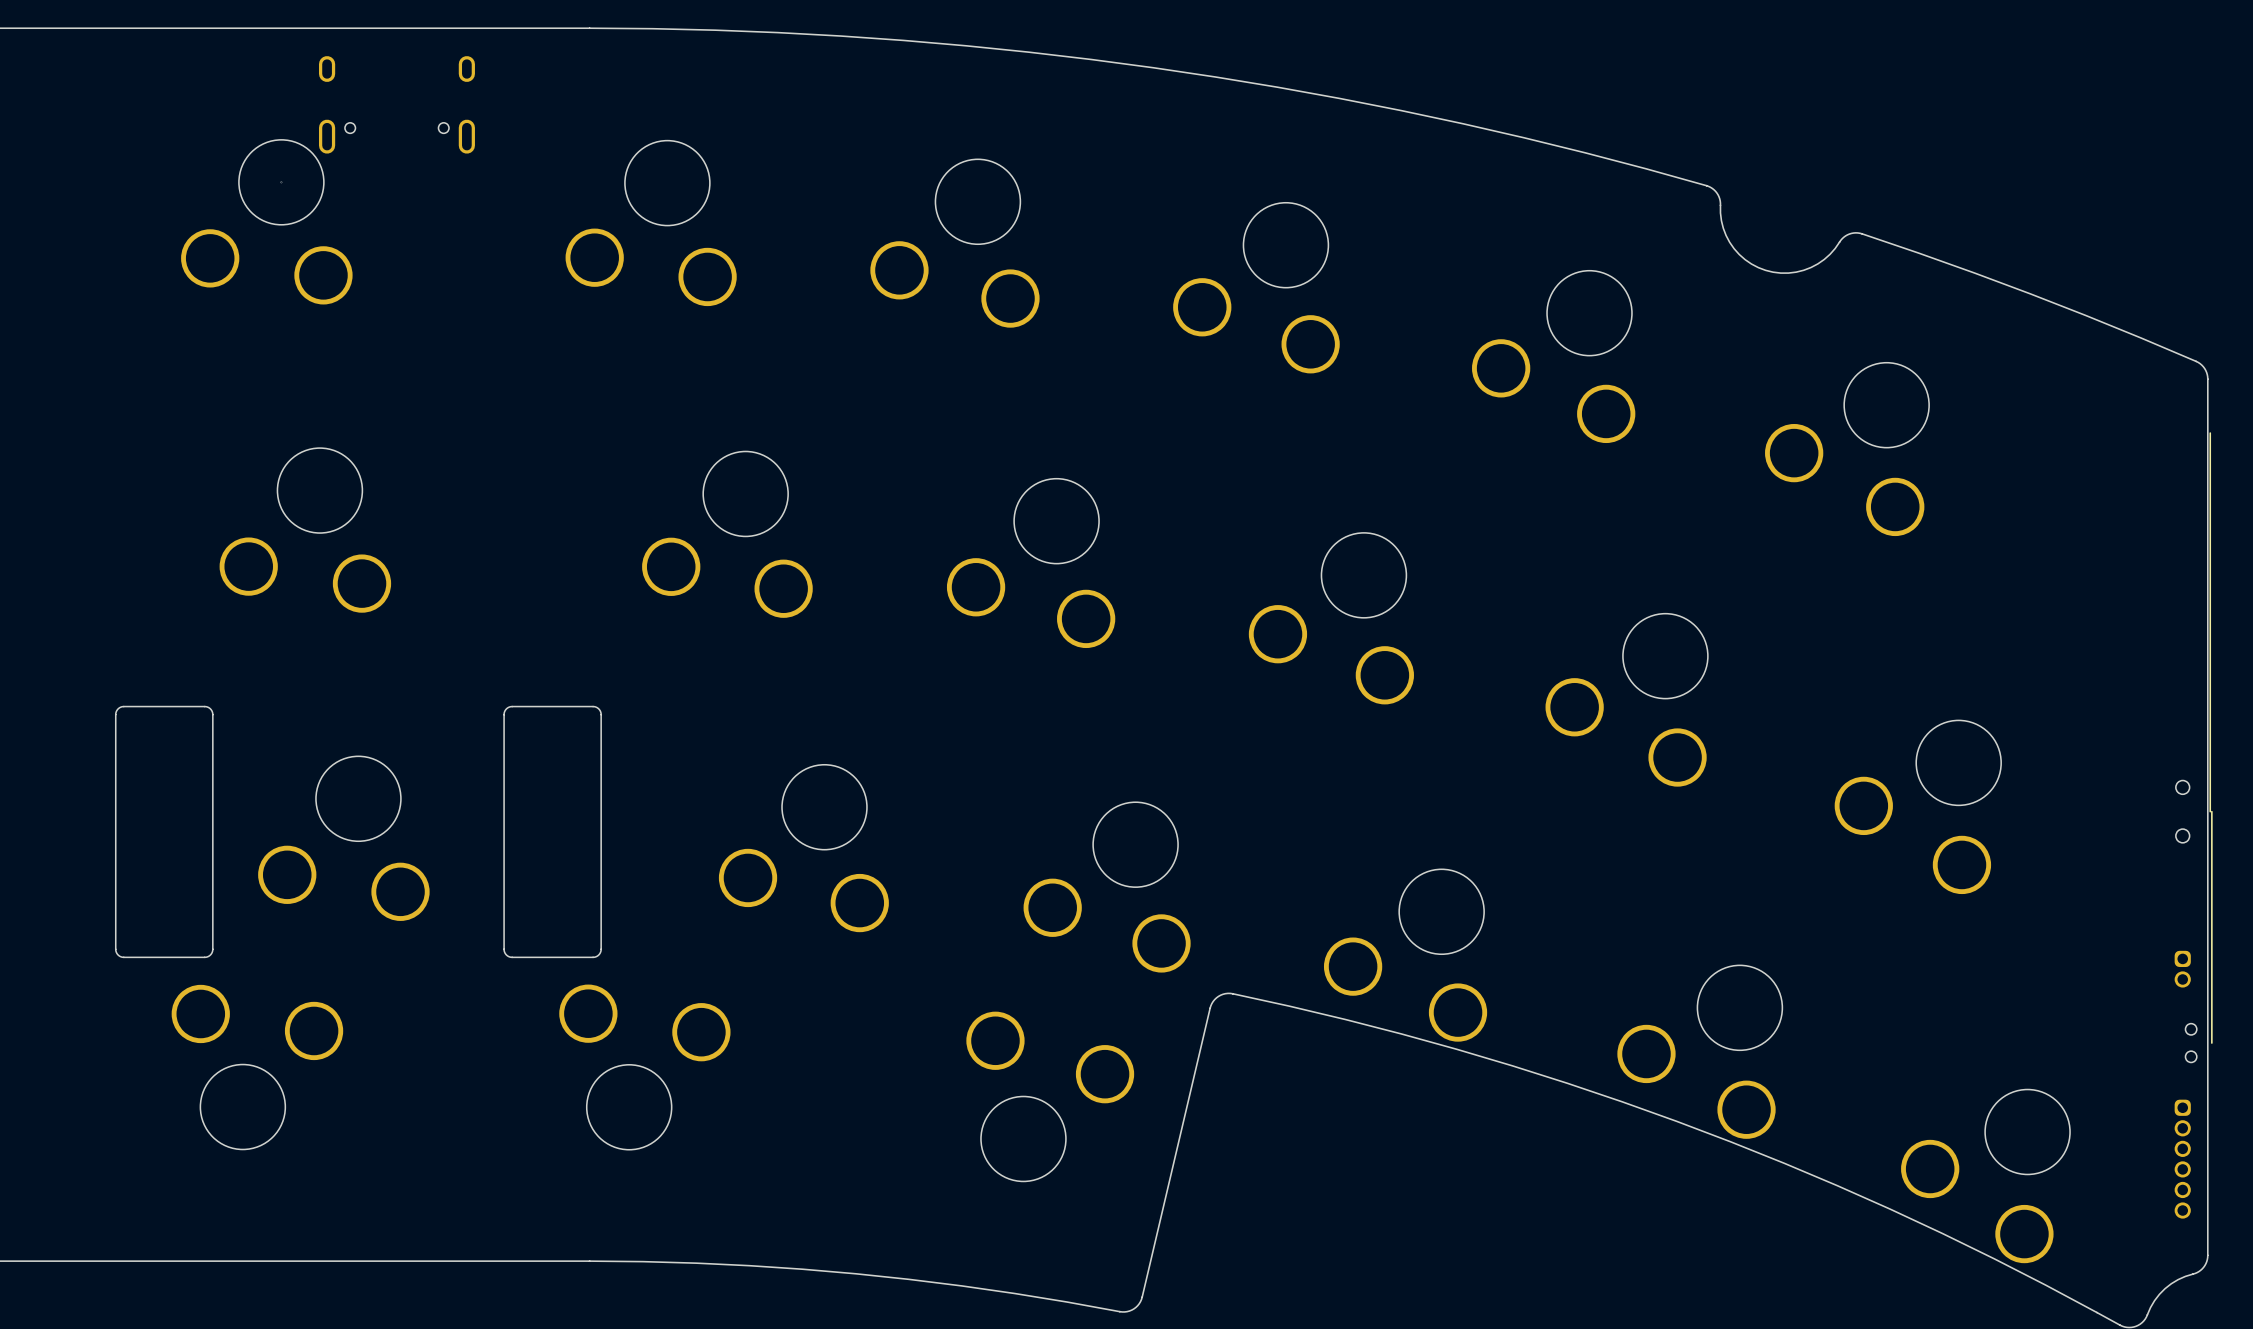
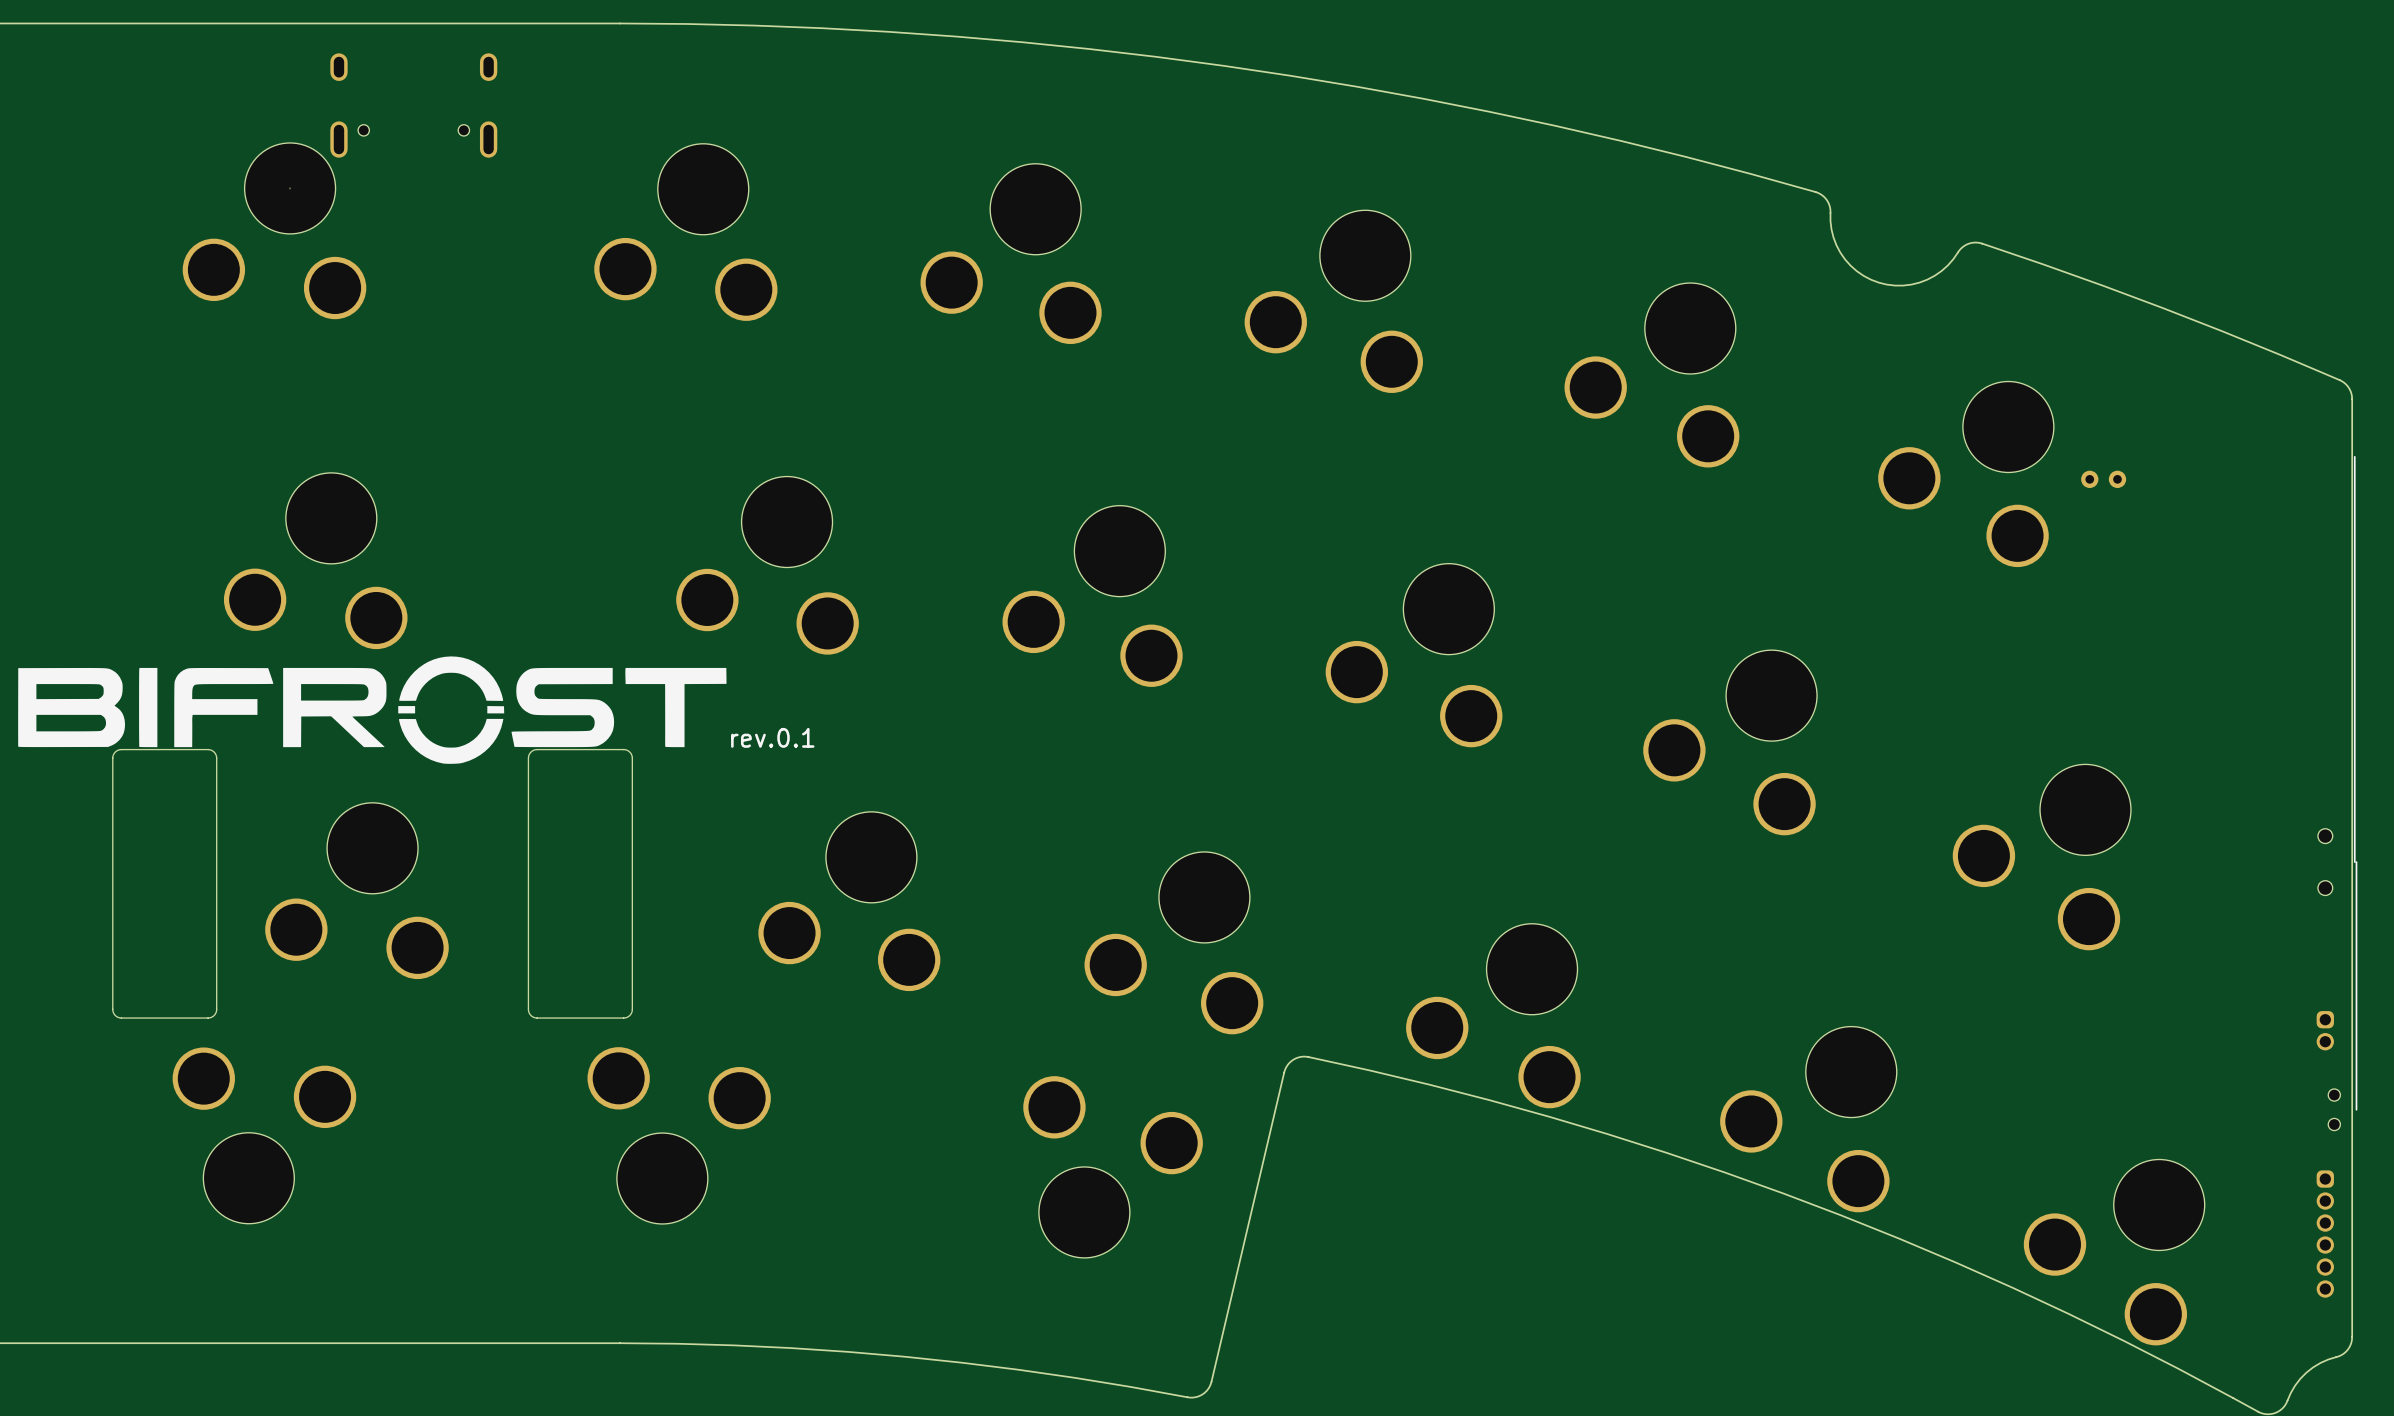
part: none -> (2089, 479)
part: none -> (2117, 479)
drawing: none -> [18, 656, 727, 764]
text: none -> rev.0.1 (772, 737)

